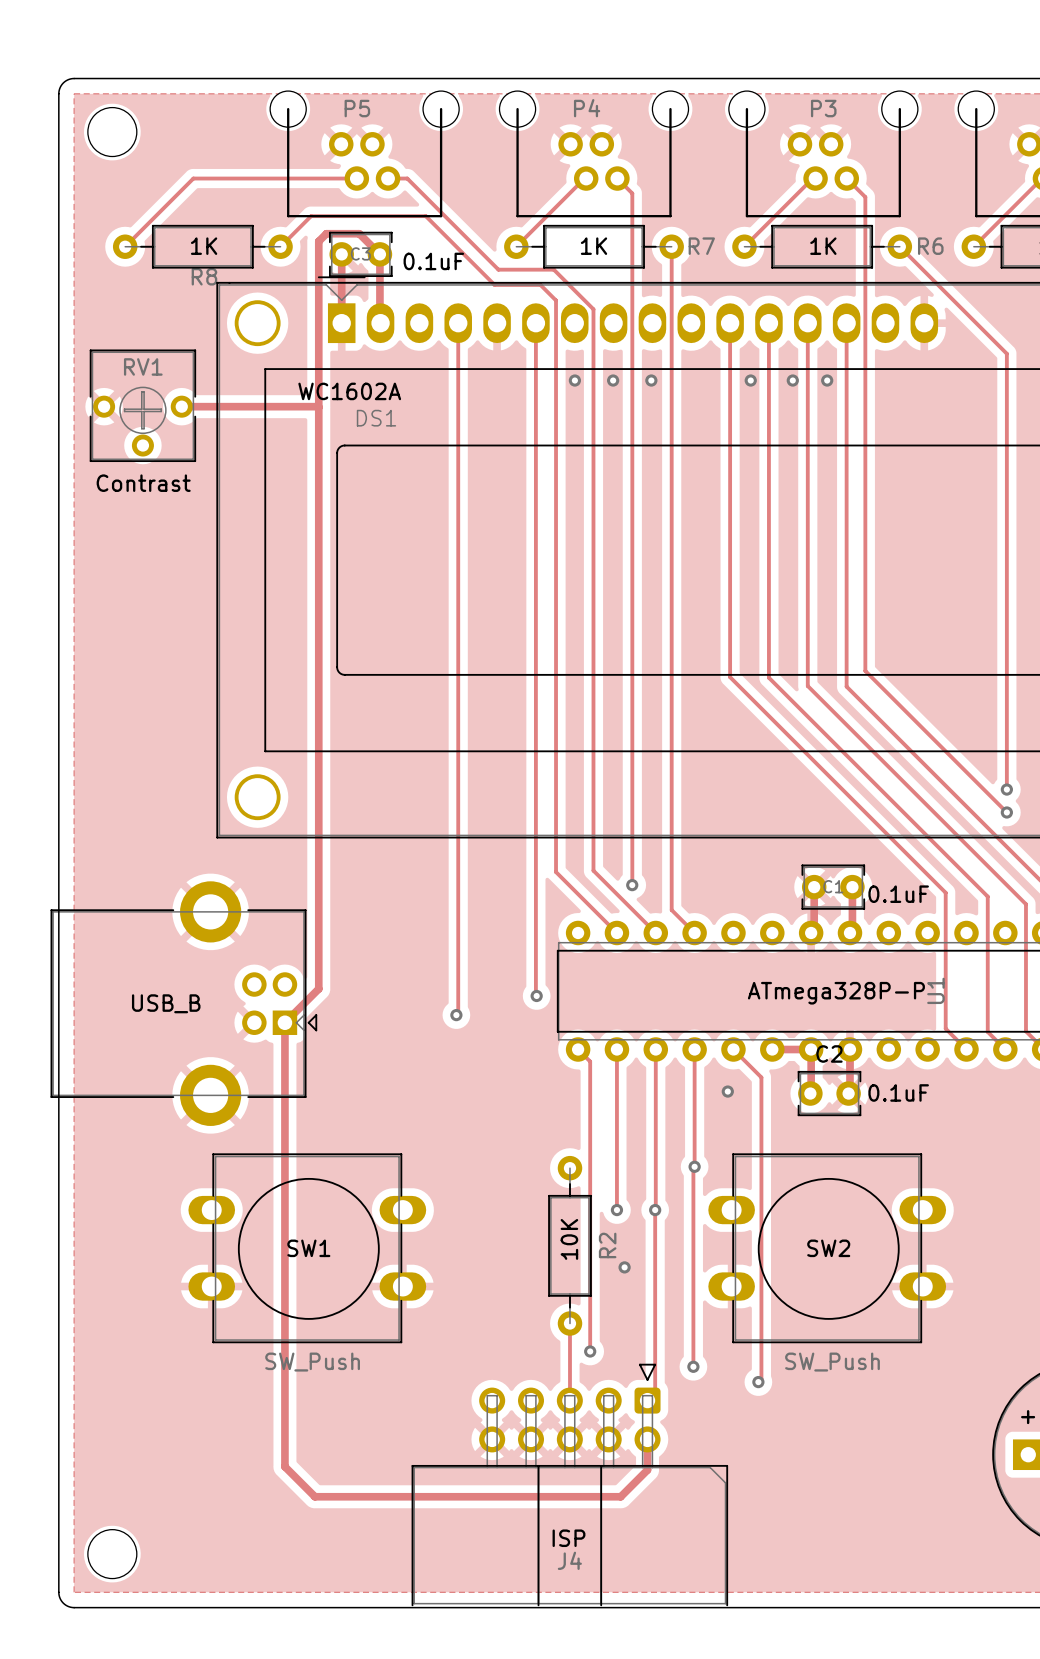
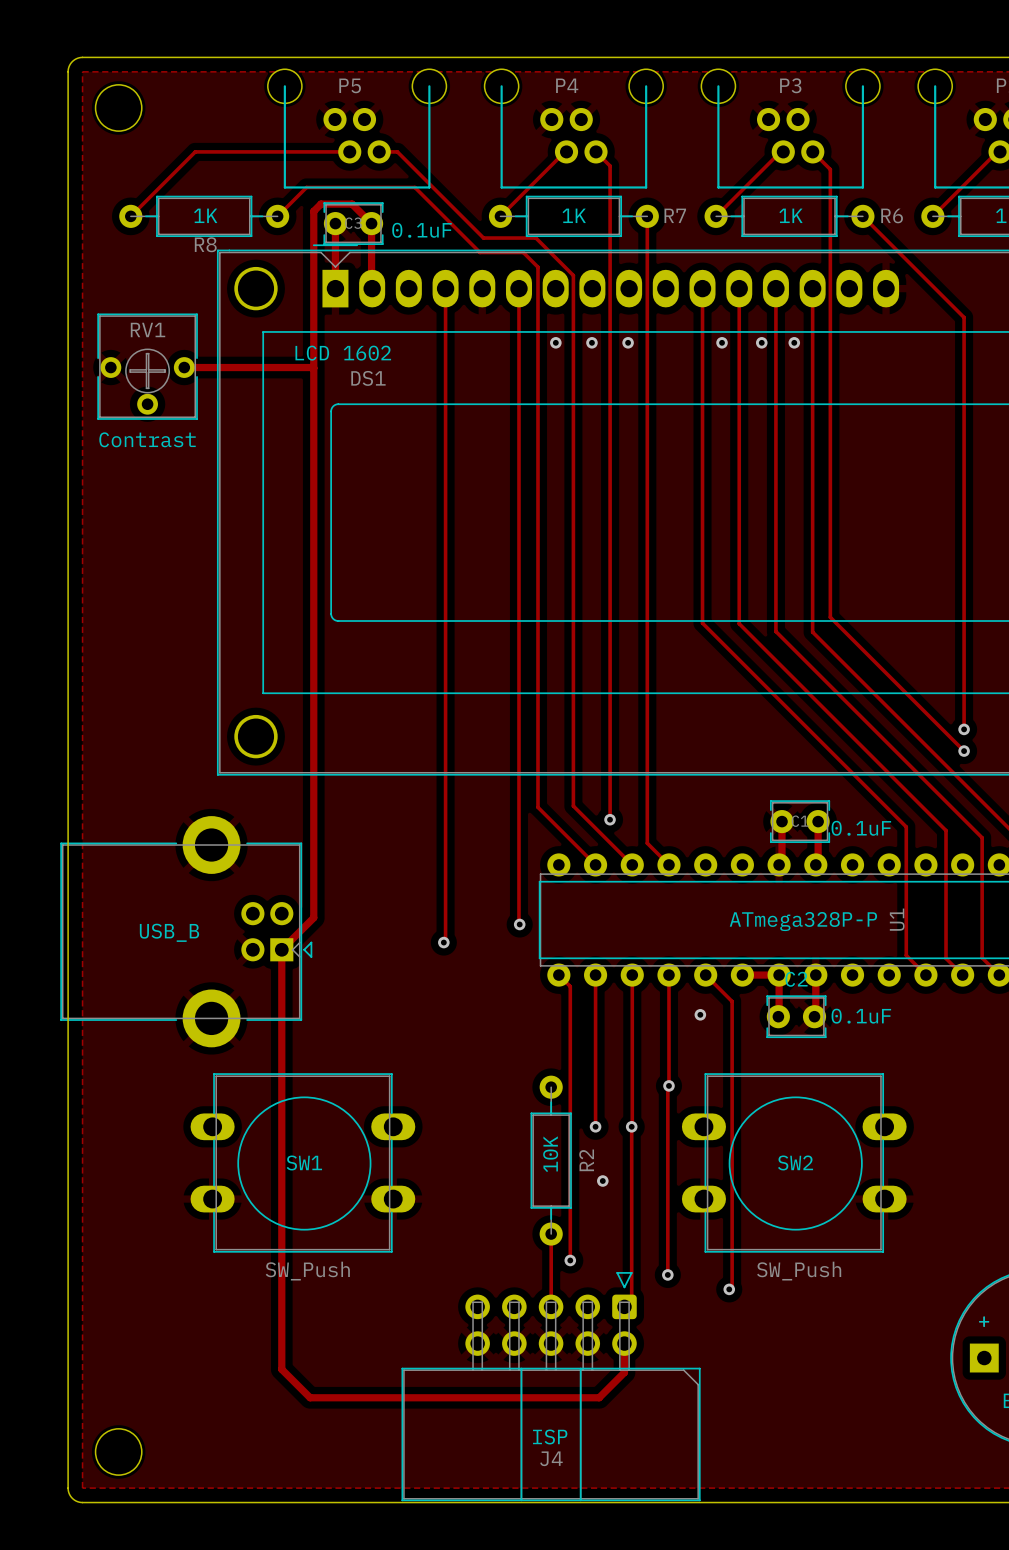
DS1 value: WC1602A (349, 391) -> LCD 1602 (343, 353)
J4 footprint: [411, 1363, 729, 1607] -> [401, 1272, 701, 1502]

